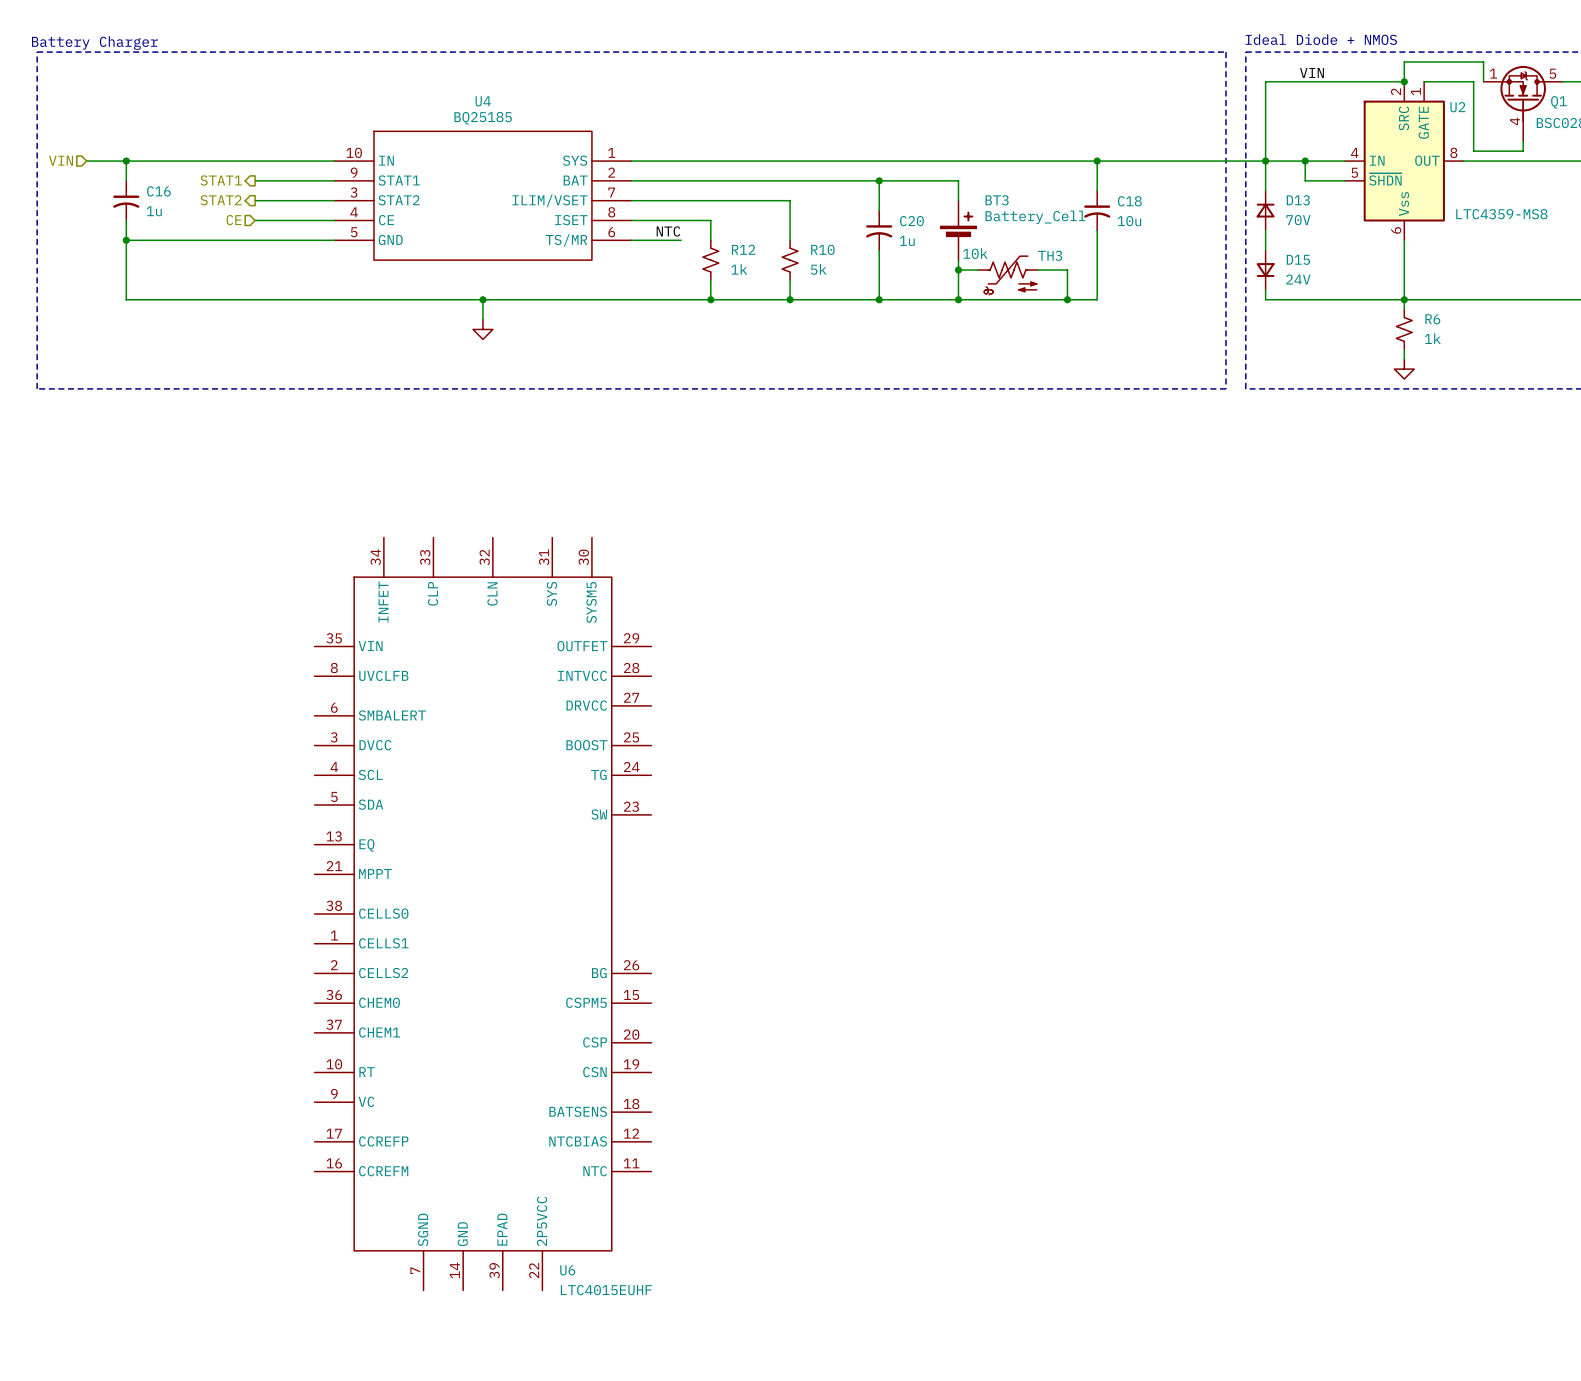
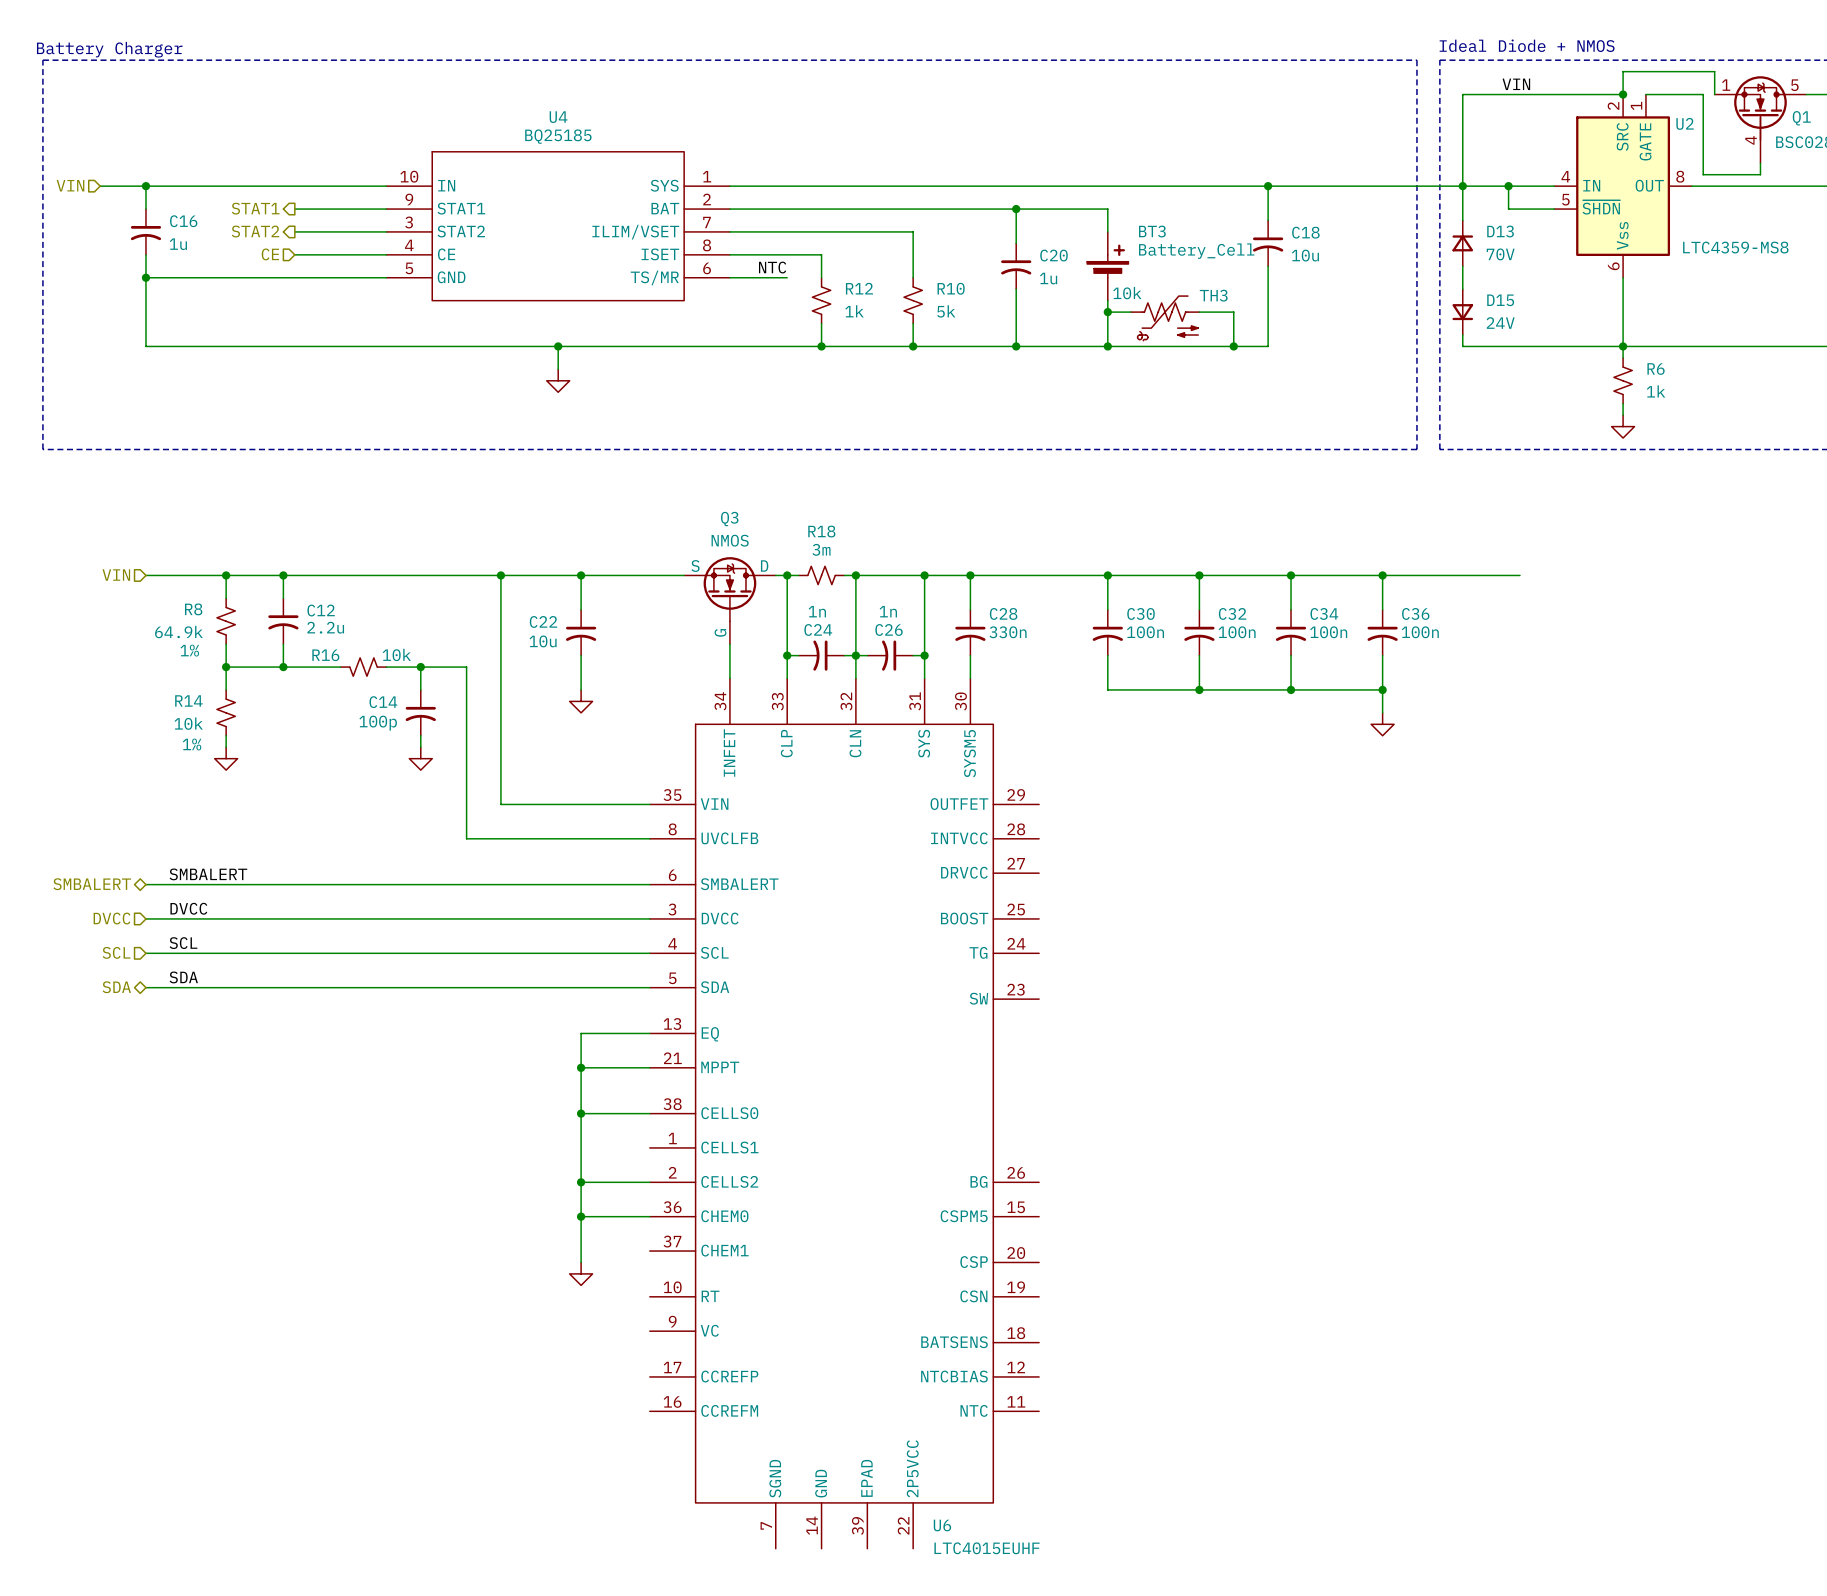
hierarchical label: none -> VIN (116, 575)
wire: none -> (145, 575) (684, 575)
wire: none -> (226, 575) (226, 598)
junction: none -> (226, 575)
wire: none -> (283, 575) (283, 598)
junction: none -> (283, 575)
wire: none -> (500, 575) (500, 804) (649, 804)
junction: none -> (500, 575)
wire: none -> (581, 575) (581, 609)
junction: none -> (581, 575)
wire: none -> (775, 575) (798, 575)
wire: none -> (787, 575) (787, 678)
junction: none -> (787, 575)
R18: none -> 3m (821, 575)
wire: none -> (844, 575) (1520, 575)
wire: none -> (855, 575) (855, 678)
junction: none -> (855, 575)
wire: none -> (924, 575) (924, 678)
junction: none -> (924, 575)
wire: none -> (970, 575) (970, 609)
junction: none -> (970, 575)
wire: none -> (1107, 575) (1107, 609)
junction: none -> (1107, 575)
wire: none -> (1199, 575) (1199, 609)
junction: none -> (1199, 575)
wire: none -> (1291, 575) (1291, 609)
junction: none -> (1291, 575)
wire: none -> (1382, 575) (1382, 609)
junction: none -> (1382, 575)
Q3: none -> NMOS (729, 600)
R8: none -> 64.9k (226, 621)
C12: none -> 2.2u (283, 621)
C22: none -> 10u (581, 632)
C28: none -> 330n (970, 632)
C30: none -> 100n (1107, 632)
C32: none -> 100n (1199, 632)
C34: none -> 100n (1291, 632)
C36: none -> 100n (1382, 632)
wire: none -> (226, 644) (226, 689)
wire: none -> (283, 644) (283, 667)
wire: none -> (729, 644) (729, 678)
wire: none -> (581, 655) (581, 689)
wire: none -> (787, 655) (798, 655)
junction: none -> (787, 655)
C24: none -> 1n (821, 655)
wire: none -> (844, 655) (867, 655)
junction: none -> (855, 655)
C26: none -> 1n (890, 655)
wire: none -> (913, 655) (924, 655)
junction: none -> (924, 655)
wire: none -> (970, 655) (970, 678)
wire: none -> (1107, 655) (1107, 689) (1382, 689)
wire: none -> (1199, 655) (1199, 689)
wire: none -> (1291, 655) (1291, 689)
wire: none -> (1382, 655) (1382, 712)
wire: none -> (226, 667) (340, 667)
junction: none -> (226, 667)
junction: none -> (283, 667)
R16: none -> 10k (363, 667)
wire: none -> (386, 667) (466, 667) (466, 838) (649, 838)
wire: none -> (420, 667) (420, 689)
junction: none -> (420, 667)
junction: none -> (1199, 689)
junction: none -> (1291, 689)
junction: none -> (1382, 689)
power symbol: none -> (581, 701)
R14: none -> 10k (226, 712)
C14: none -> 100p (420, 712)
power symbol: none -> (1382, 724)
wire: none -> (226, 735) (226, 747)
wire: none -> (420, 735) (420, 747)
power symbol: none -> (226, 758)
power symbol: none -> (420, 758)
label: none -> SMBALERT (208, 874)
hierarchical label: none -> SMBALERT (92, 884)
wire: none -> (145, 884) (649, 884)
label: none -> DVCC (188, 908)
hierarchical label: none -> DVCC (112, 918)
wire: none -> (145, 918) (649, 918)
label: none -> SCL (183, 943)
hierarchical label: none -> SCL (116, 952)
wire: none -> (145, 953) (649, 953)
label: none -> SDA (183, 977)
hierarchical label: none -> SDA (116, 987)
wire: none -> (145, 987) (649, 987)
wire: none -> (649, 1033) (581, 1033) (581, 1262)
U6 position: (482, 913) -> (844, 1113)
wire: none -> (581, 1067) (649, 1067)
junction: none -> (581, 1067)
wire: none -> (581, 1113) (649, 1113)
junction: none -> (581, 1113)
wire: none -> (581, 1182) (649, 1182)
junction: none -> (581, 1182)
wire: none -> (581, 1216) (649, 1216)
junction: none -> (581, 1216)
power symbol: none -> (581, 1273)

